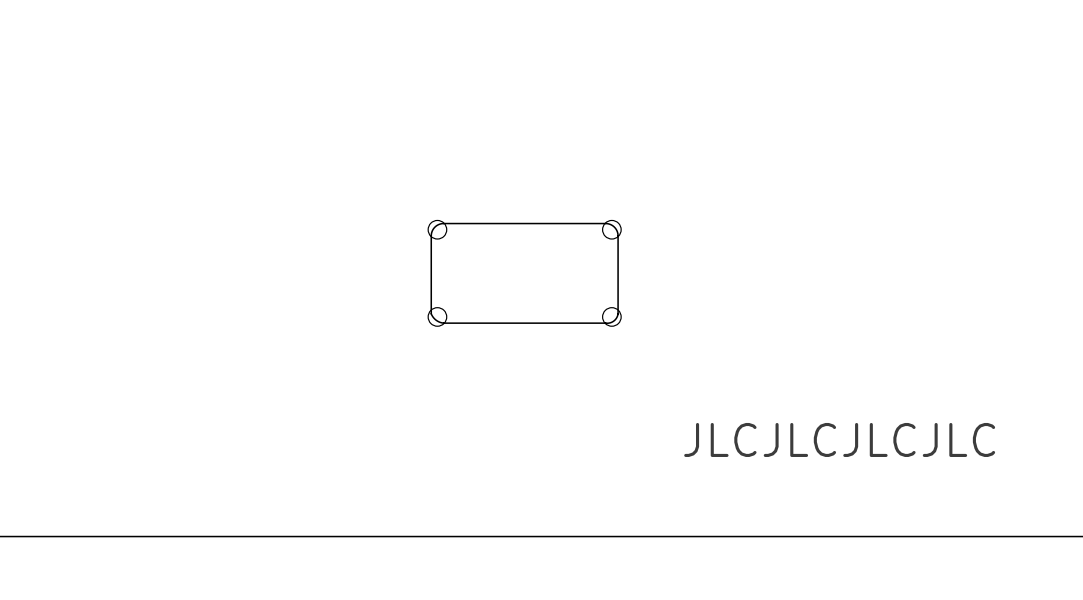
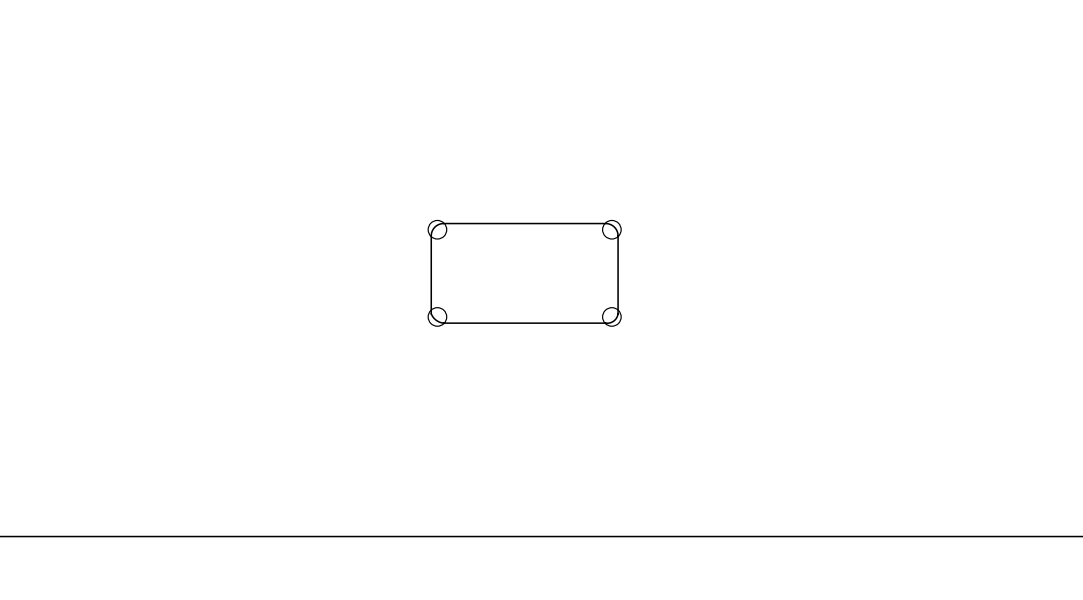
text: JLCJLCJLCJLC (839, 439) -> none

